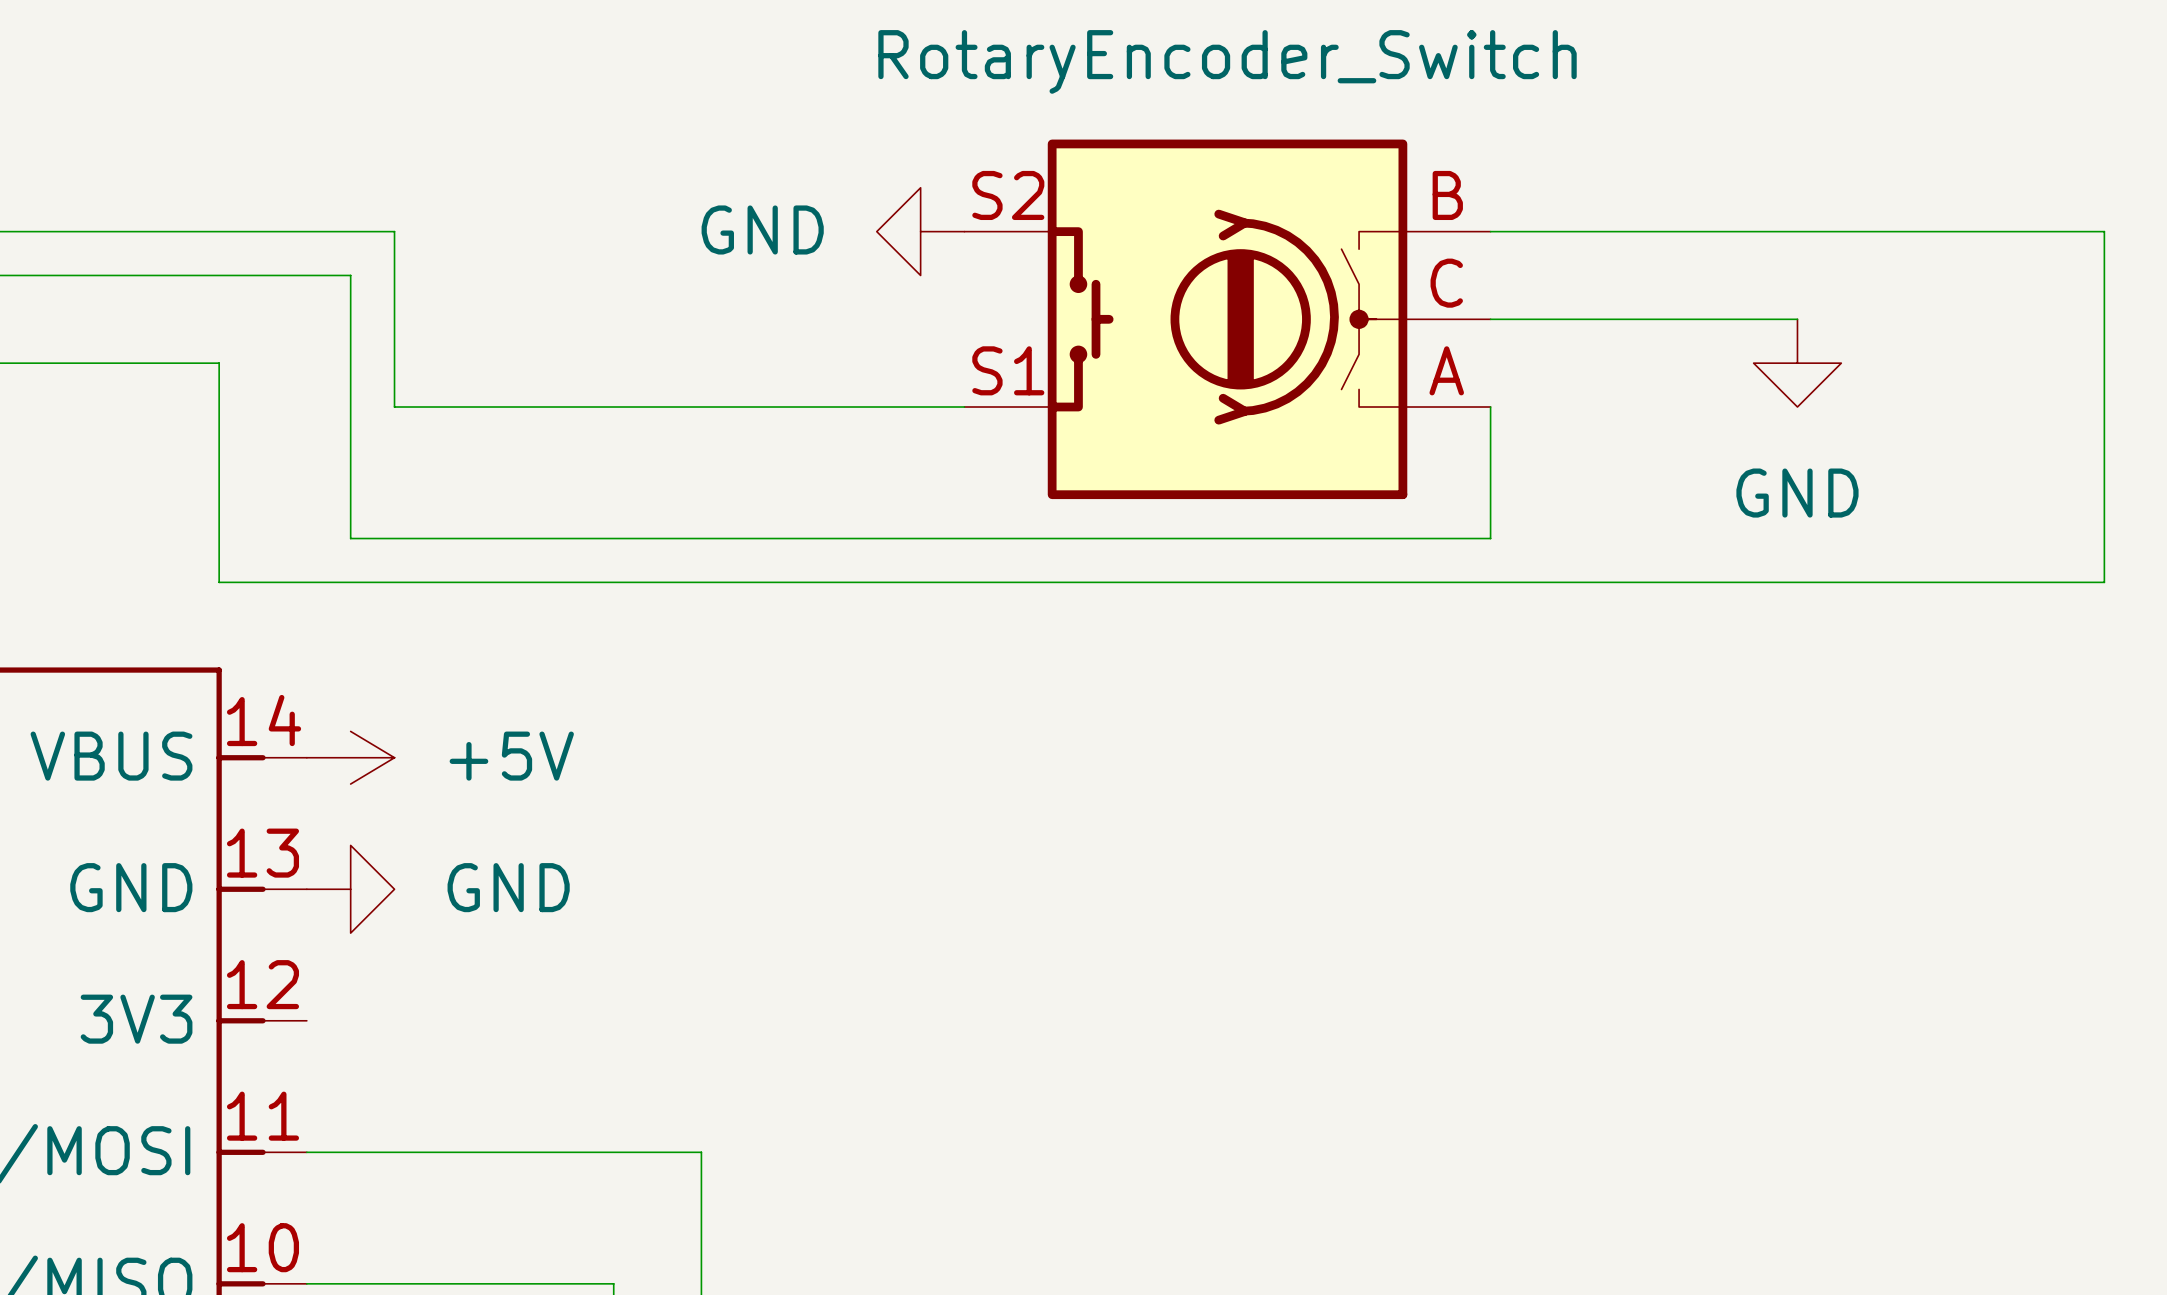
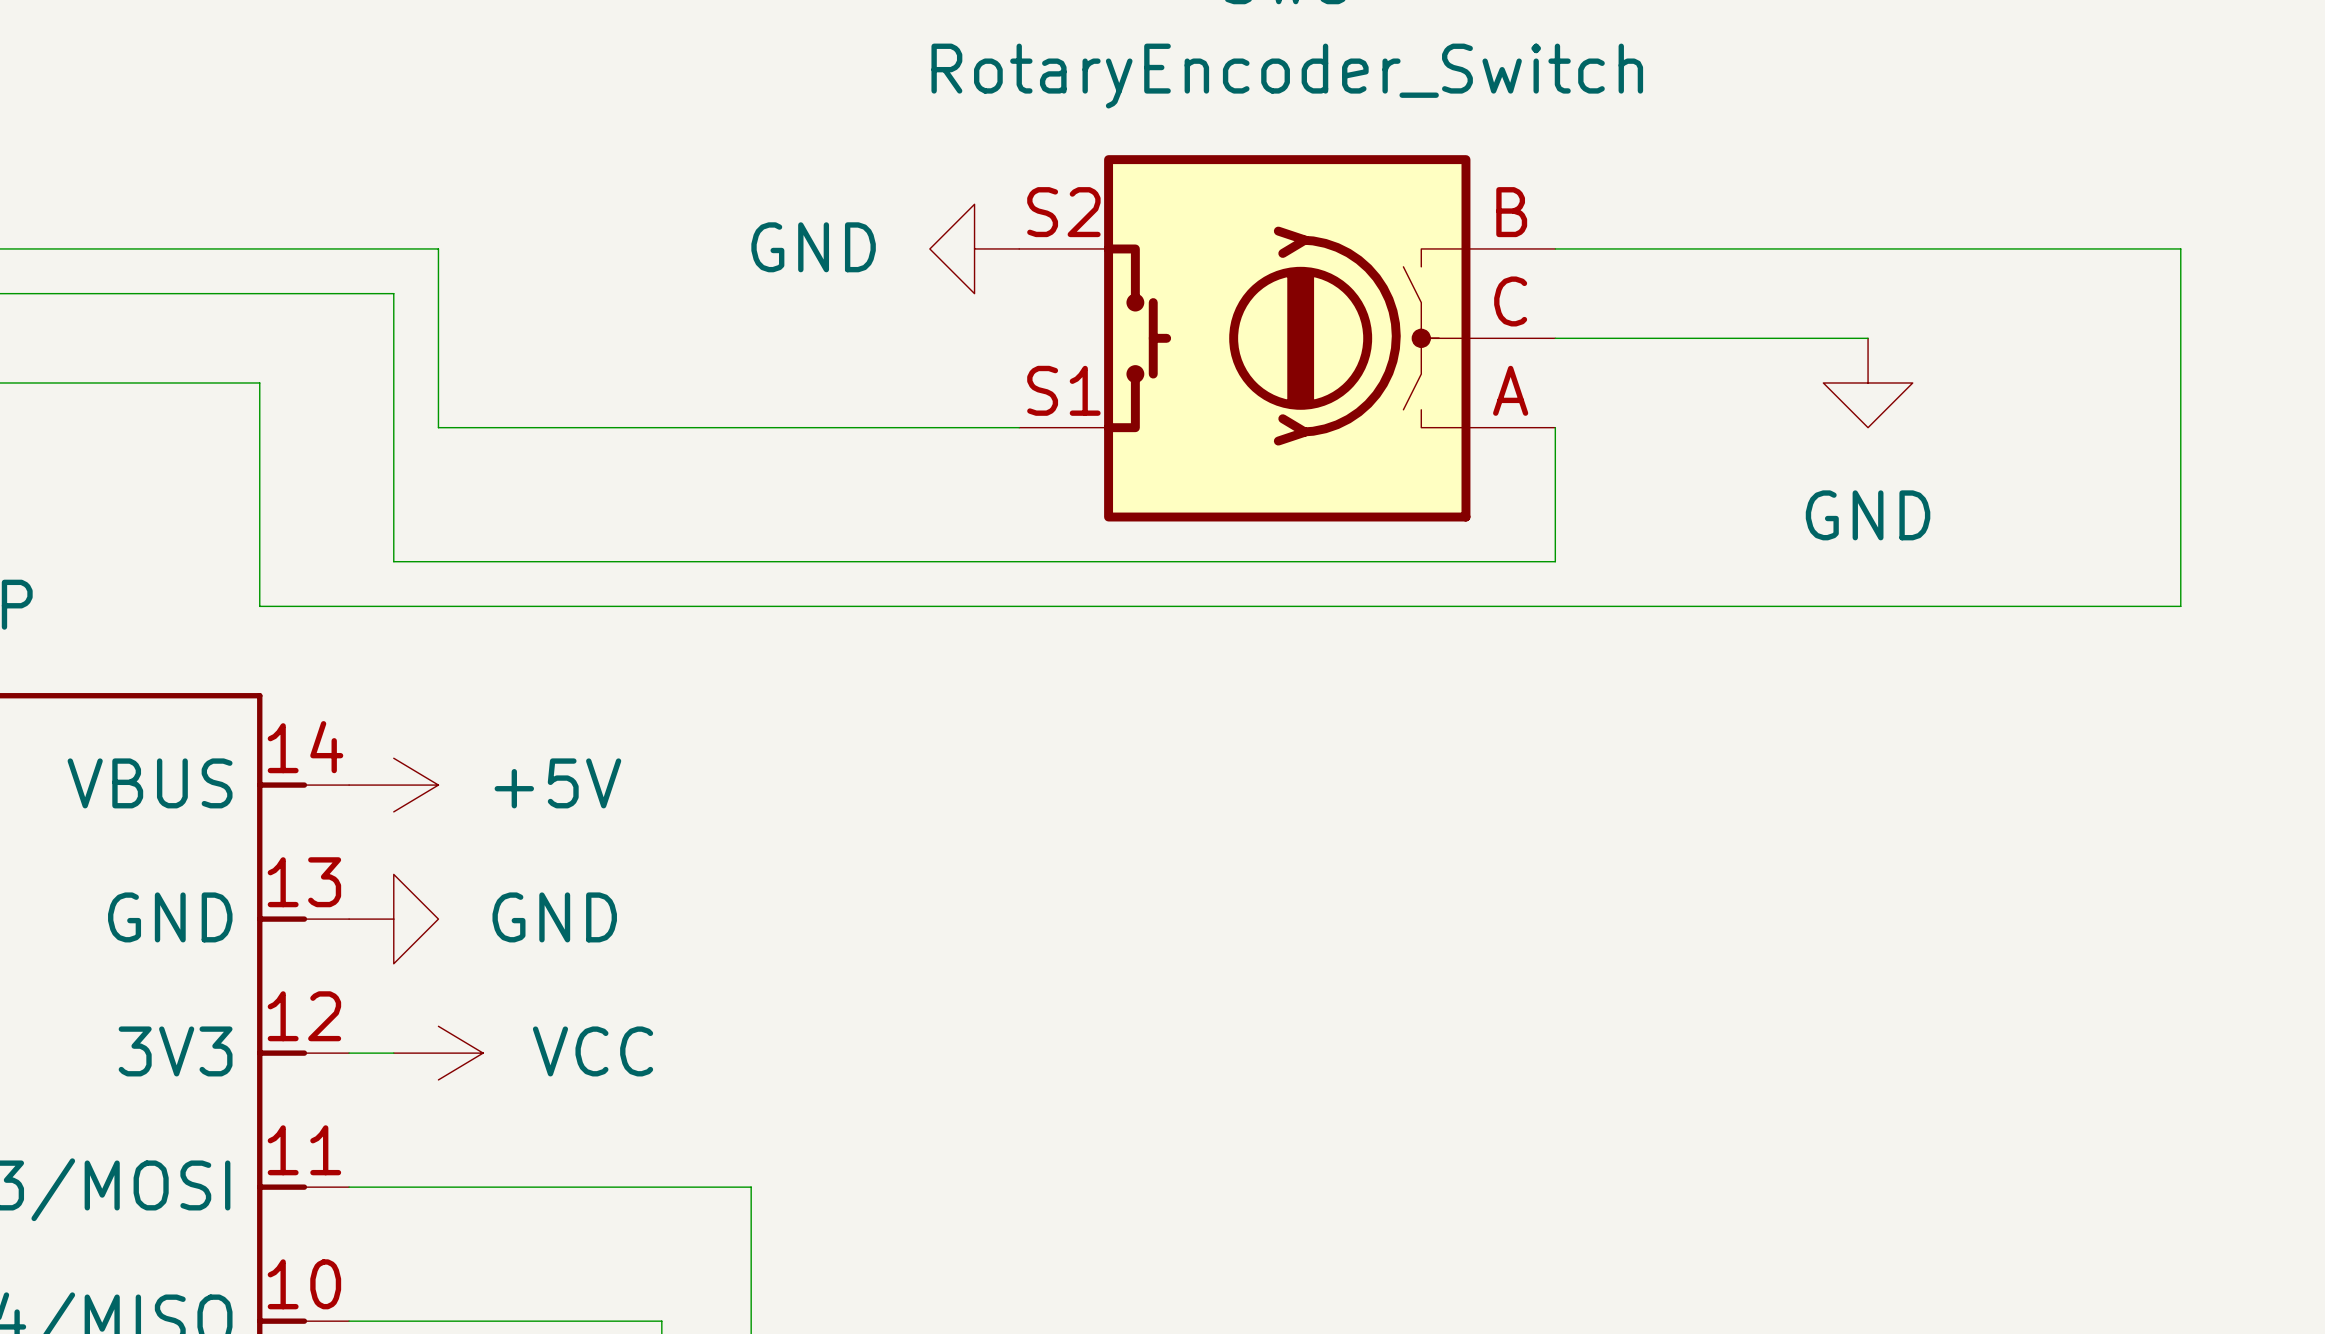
wire: none -> (349, 1053) (393, 1053)
power symbol: none -> VCC (438, 1053)

